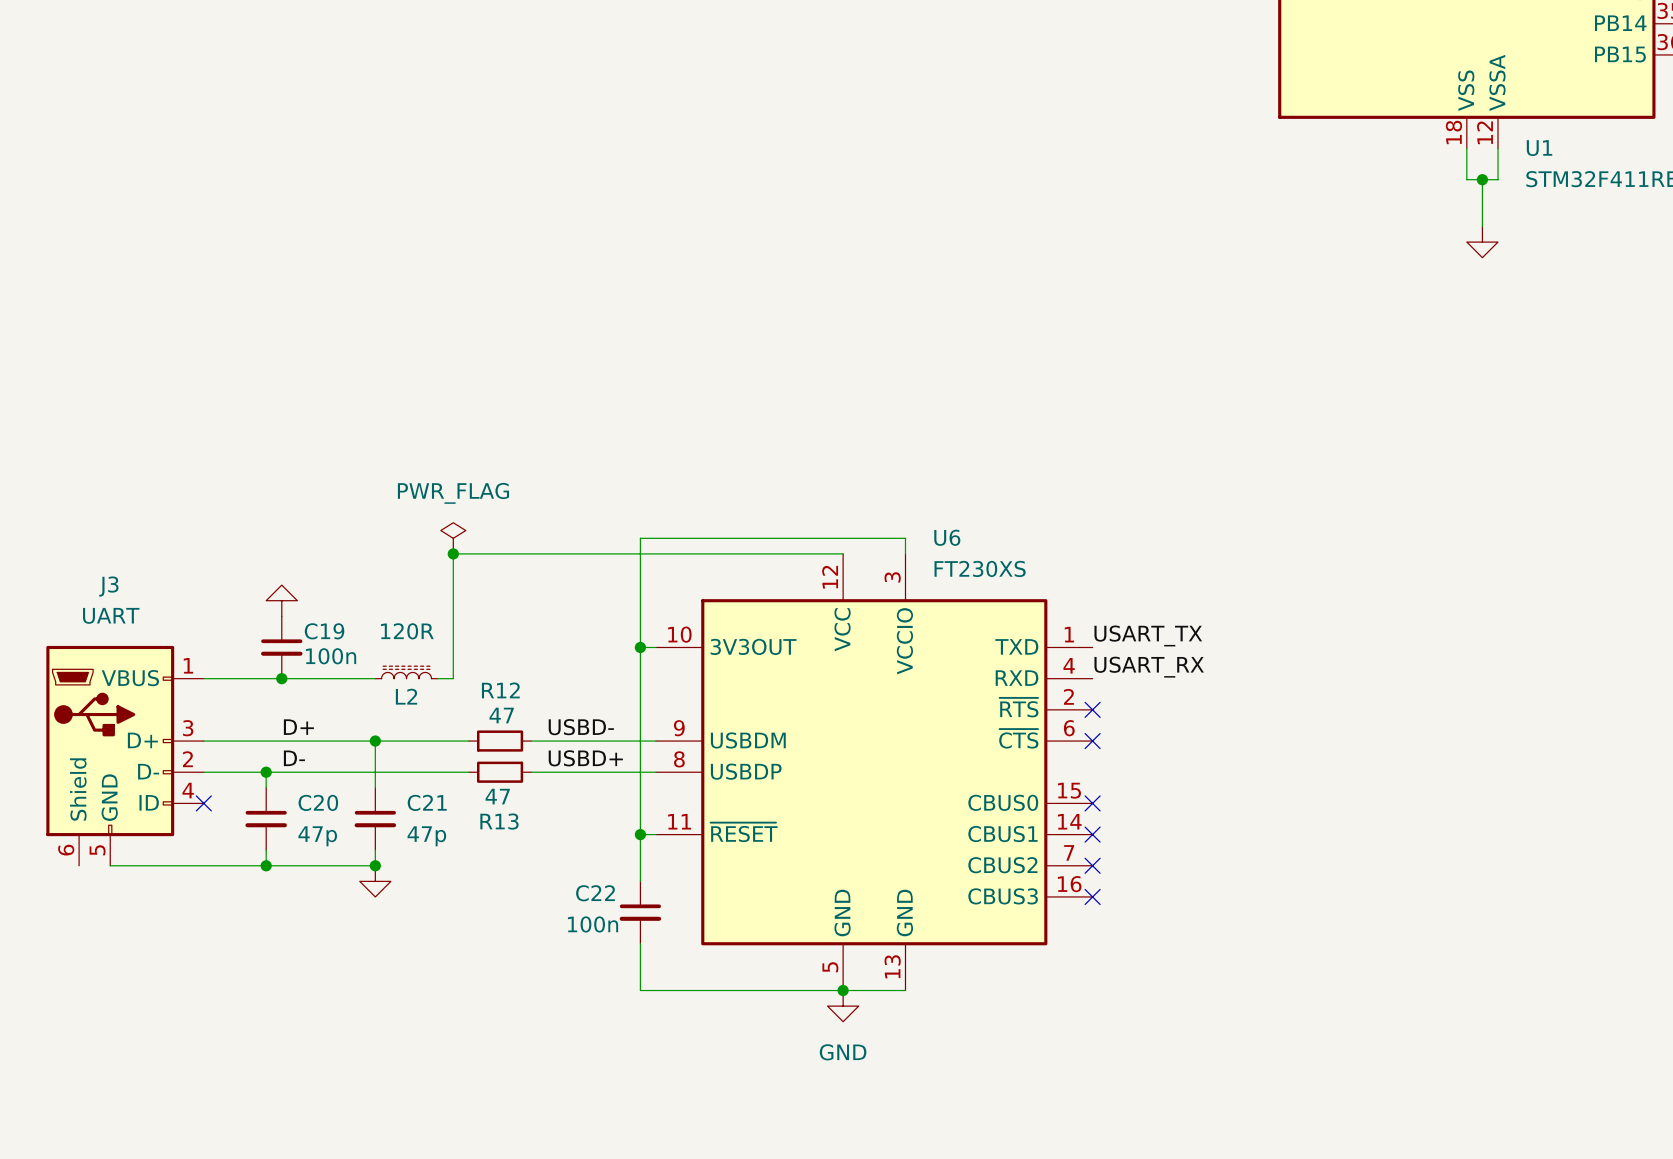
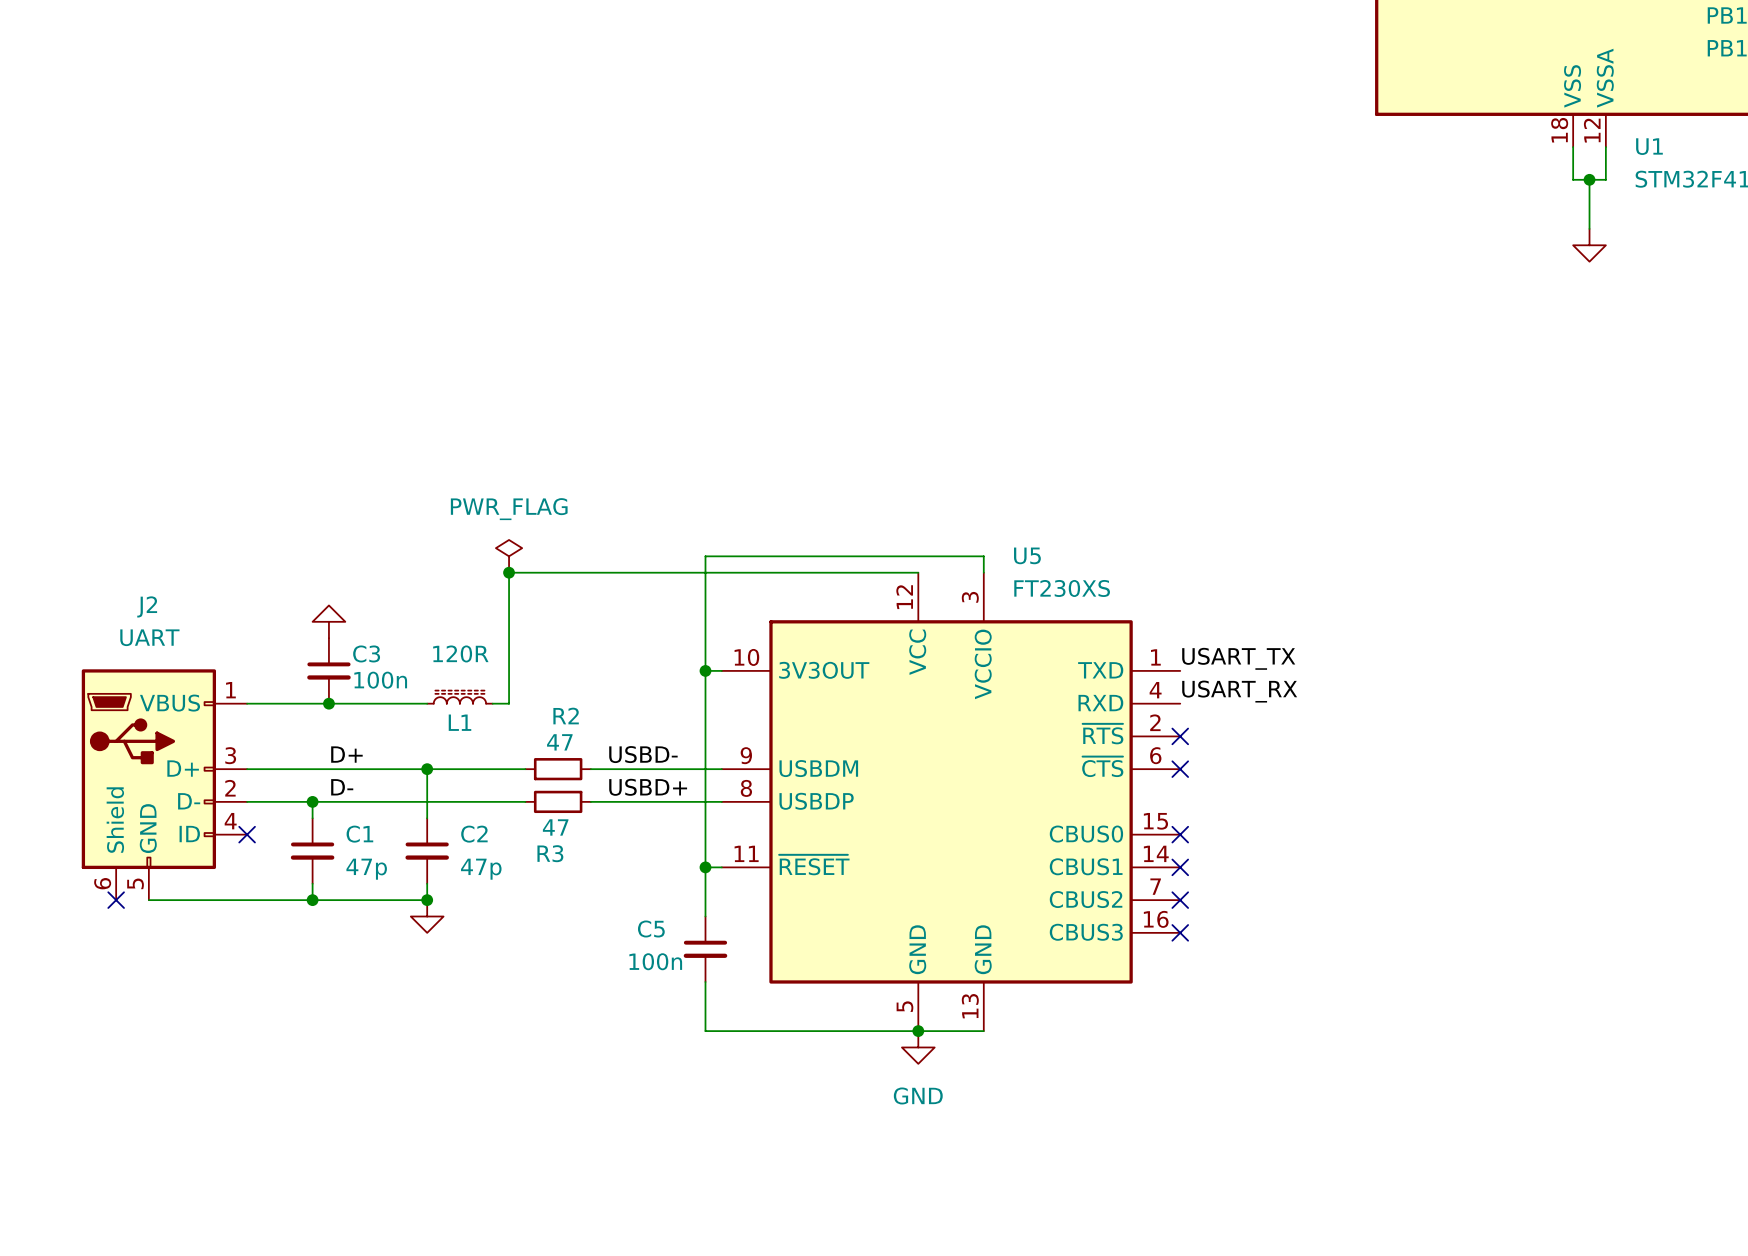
U6 name: U6 (947, 537) -> U5 (1027, 555)
J3 name: J3 (108, 586) -> J2 (147, 606)
C19 name: C19 (324, 631) -> C3 (366, 653)
R12 name: R12 (500, 690) -> R2 (566, 716)
L2 name: L2 (406, 696) -> L1 (459, 722)
C20 name: C20 (318, 802) -> C1 (359, 834)
C21 name: C21 (427, 802) -> C2 (474, 834)
R13 name: R13 (499, 821) -> R3 (550, 853)
no-connect mark: none -> (116, 900)
C22 name: C22 (595, 893) -> C5 (651, 928)

